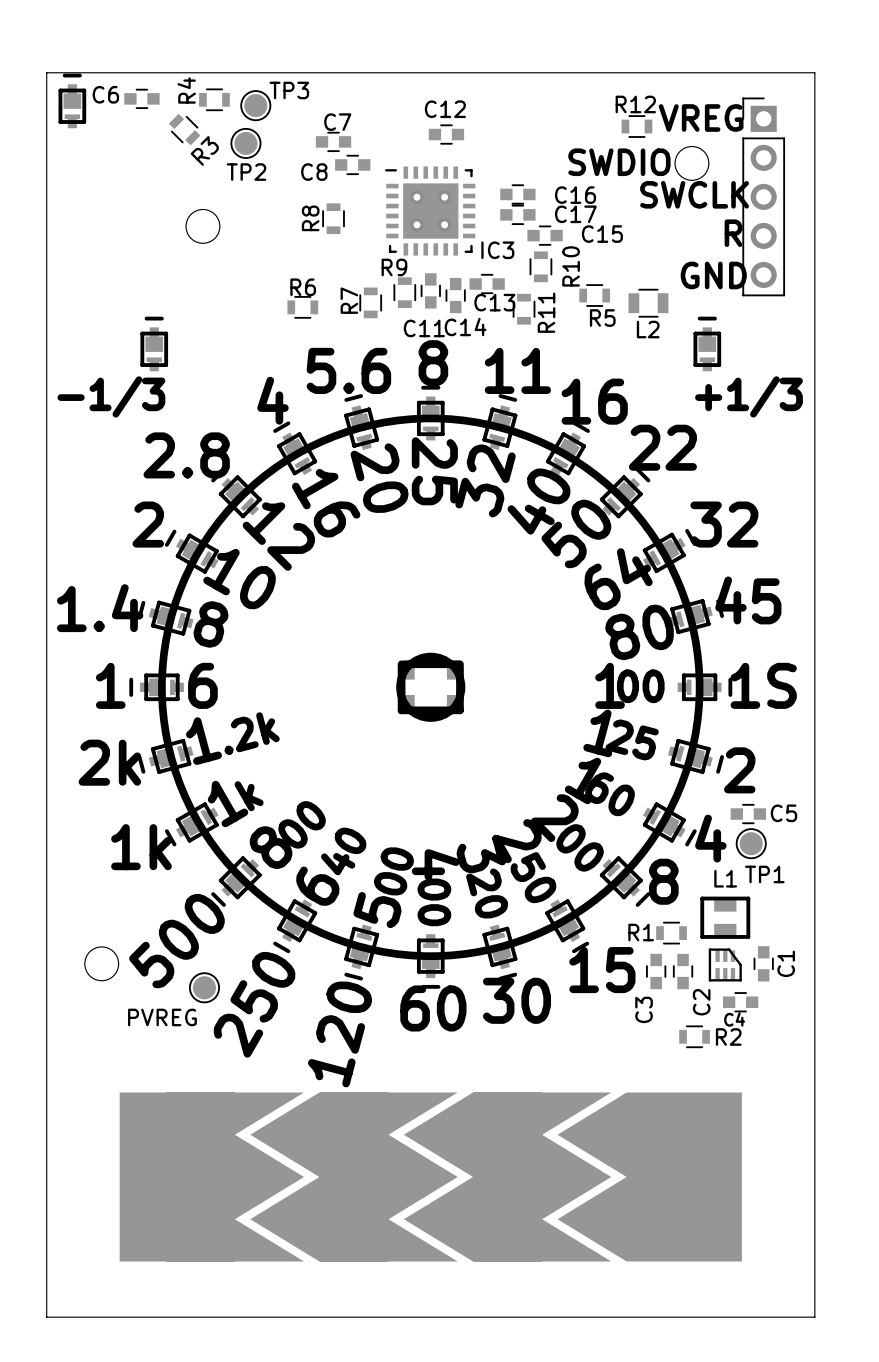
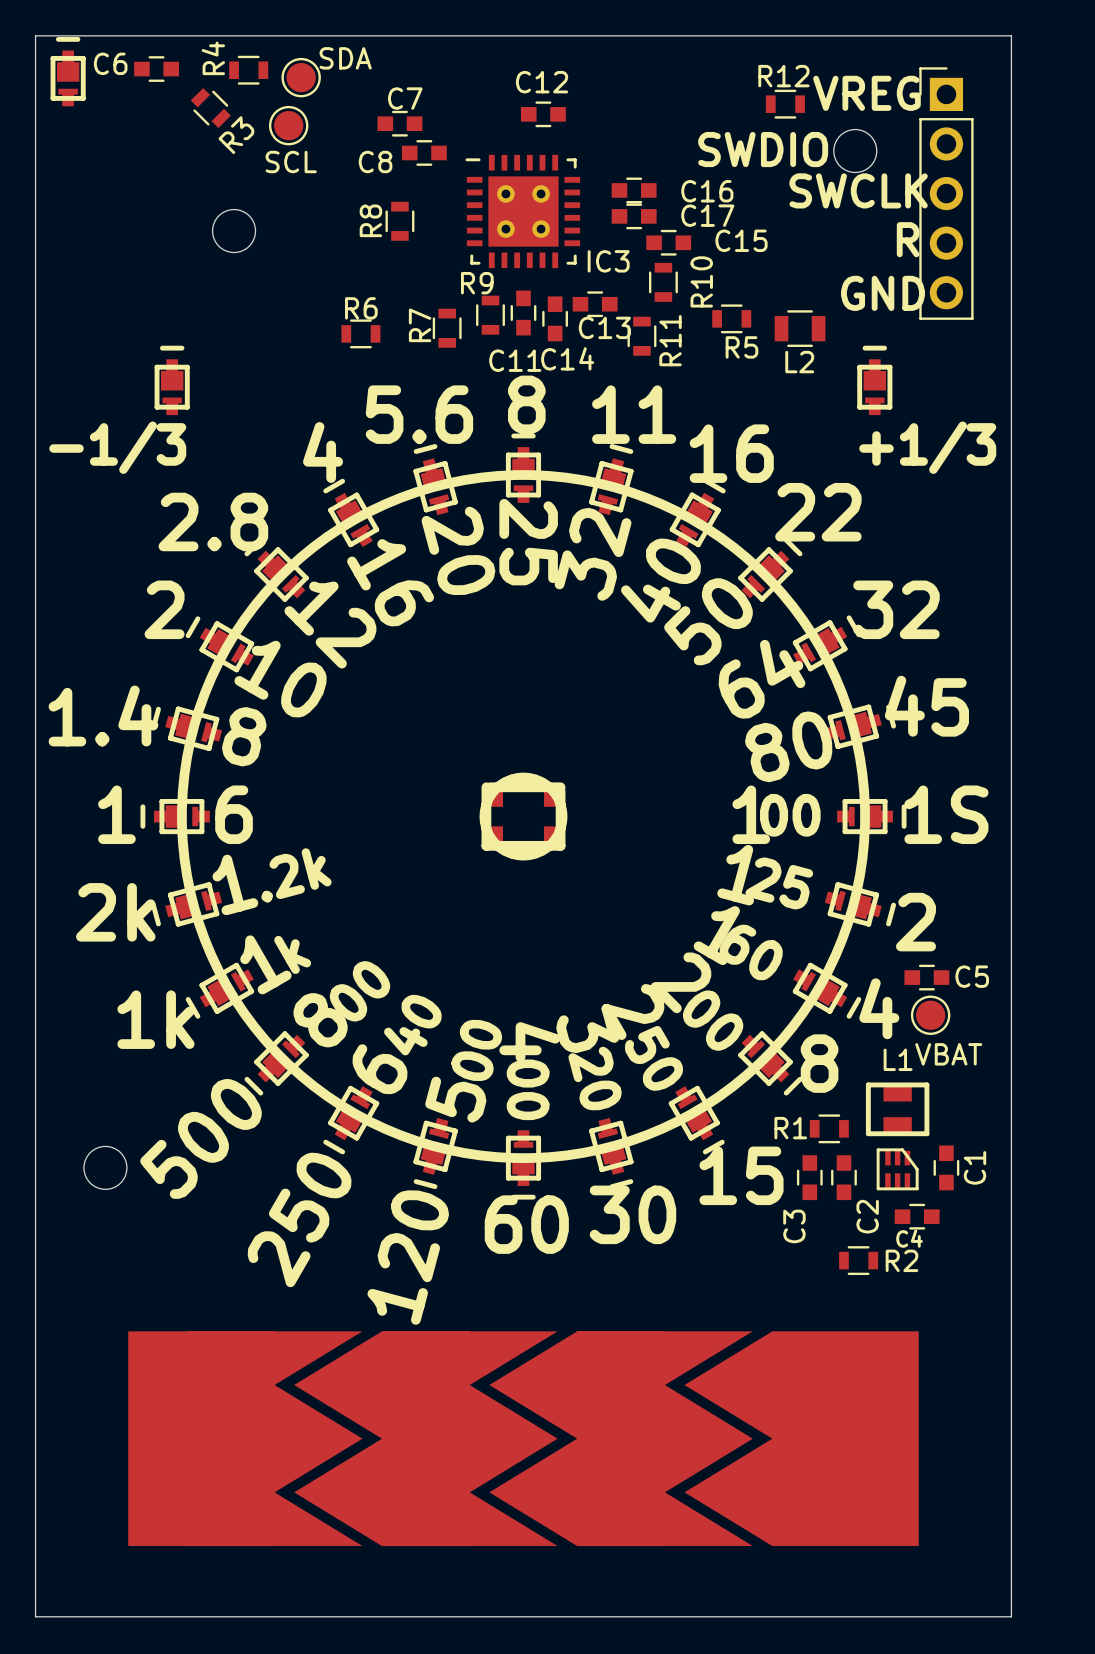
TP3 name: TP3 (289, 90) -> SDA (345, 58)
TP2 name: TP2 (246, 172) -> SCL (291, 162)
TP1 name: TP1 (764, 874) -> VBAT (948, 1054)
PVREG: (204, 987) -> none

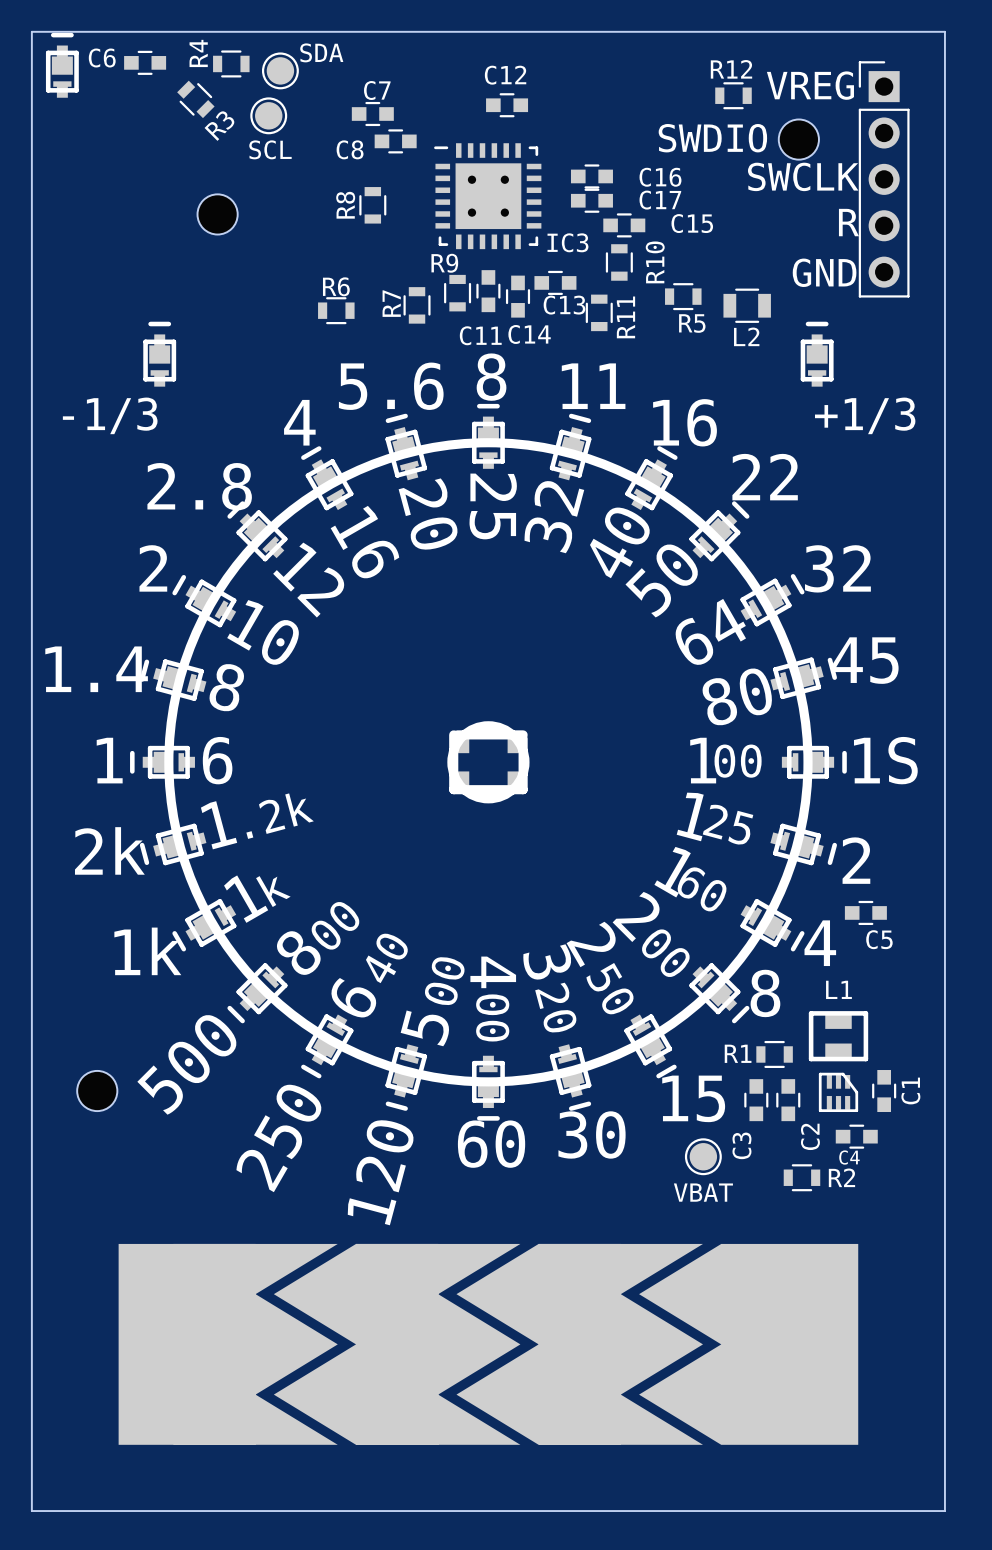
C5 name position: C5 (972, 976) -> C5 (879, 939)
VBAT position: (930, 1015) -> (703, 1156)
VBAT name position: VBAT (948, 1054) -> VBAT (703, 1192)

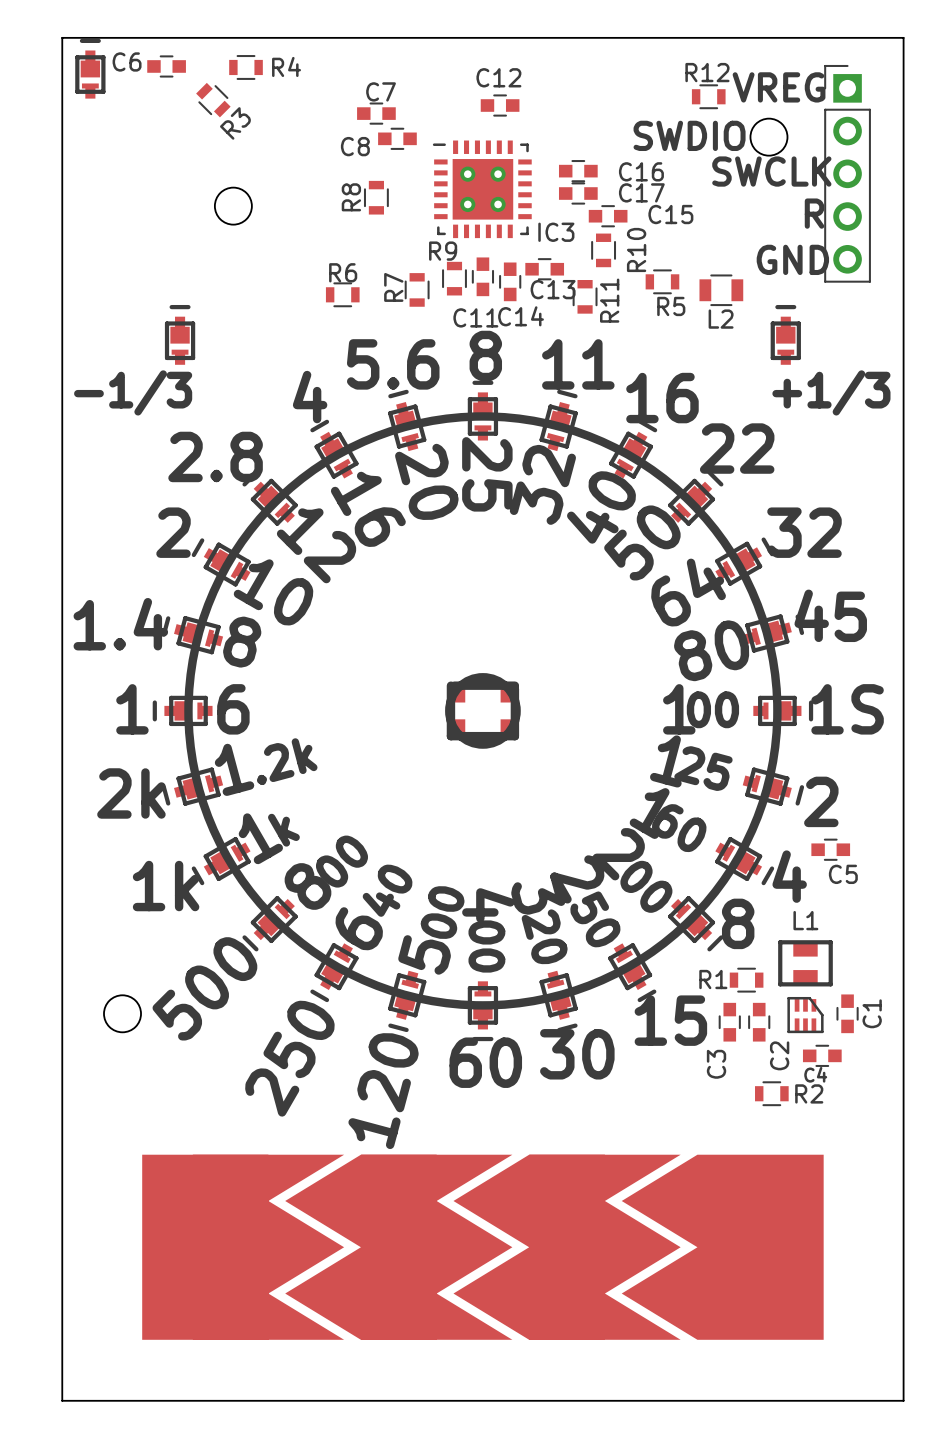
R4 name rotation: 0° (198, 53) -> 90° clockwise (286, 66)
R4 name position: R4 (198, 53) -> R4 (286, 66)
SDA: (280, 70) -> none
SCL: (268, 115) -> none
VBAT: (703, 1156) -> none

